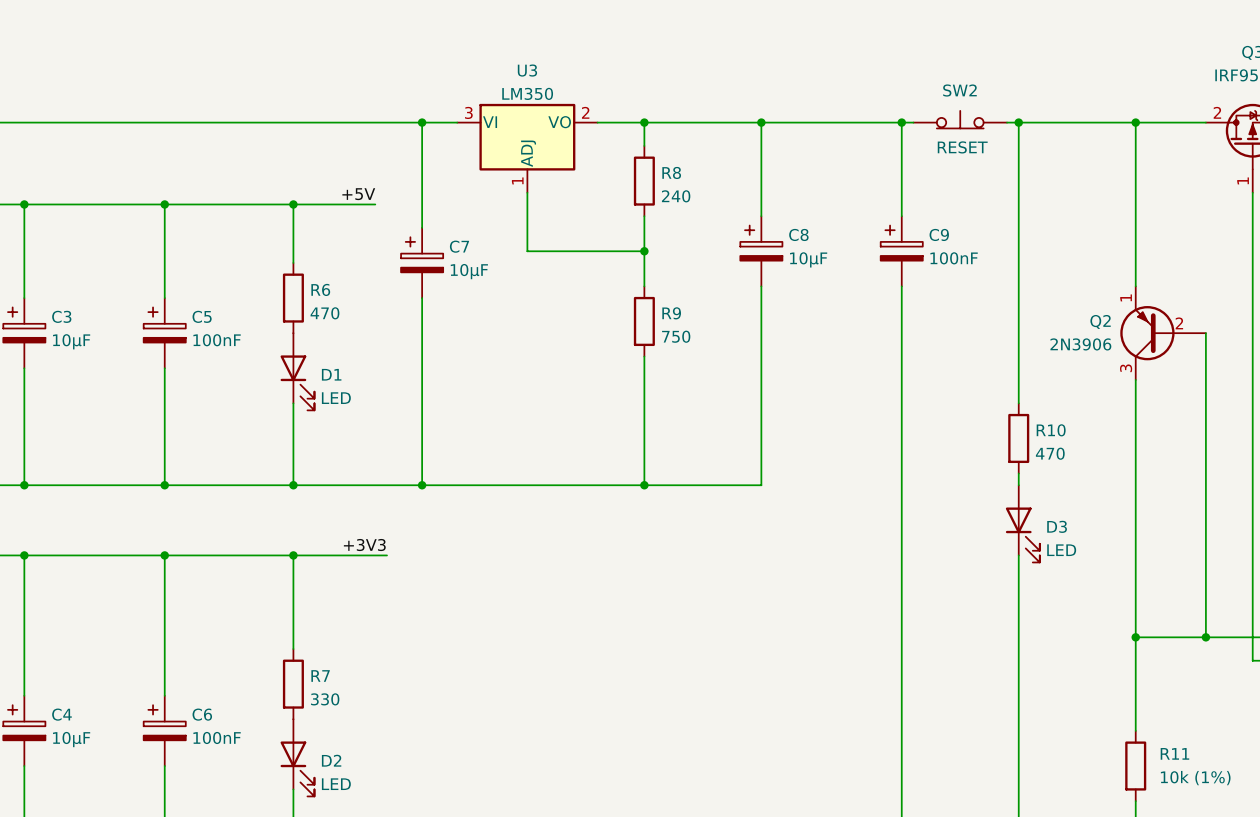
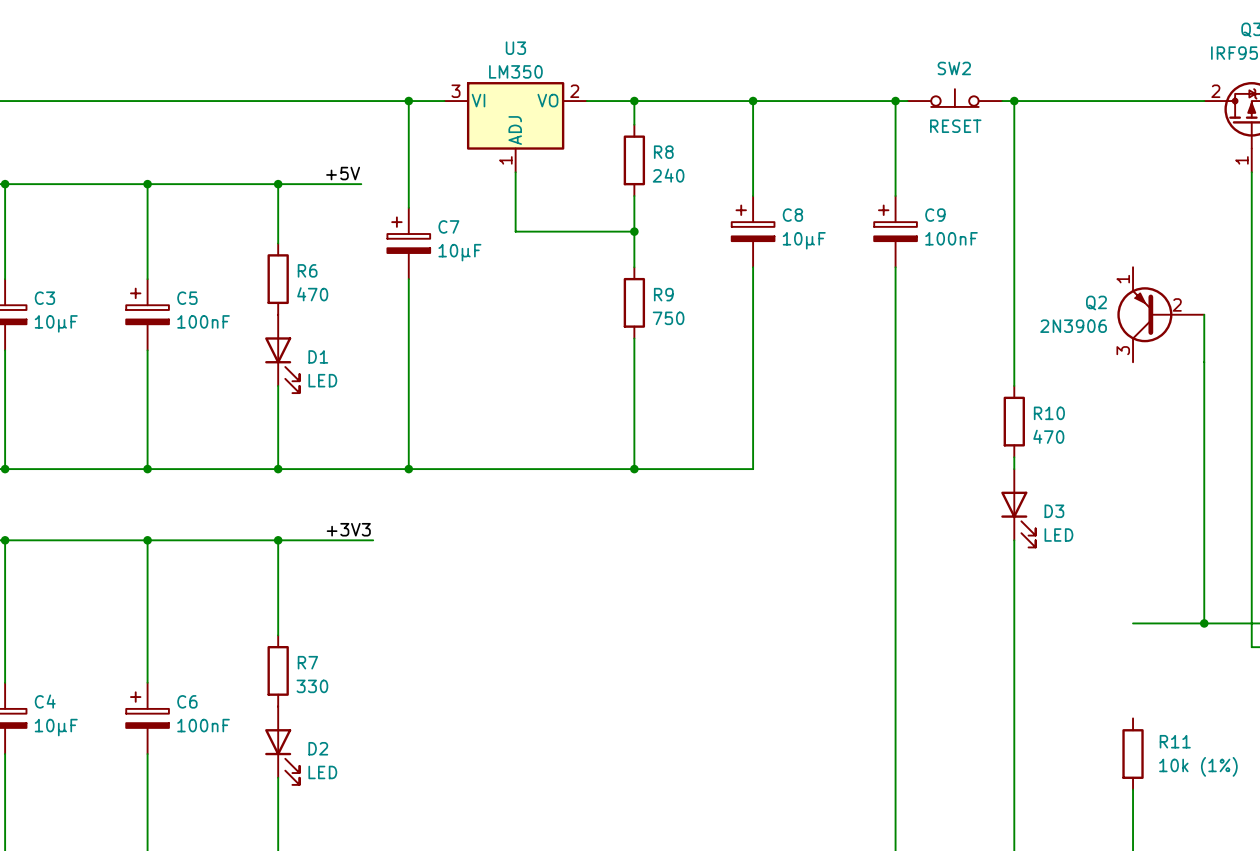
wire: (1135, 122) (1135, 286) -> none
junction: (1135, 122) -> none
wire: (1135, 379) (1135, 730) -> none
junction: (1135, 637) -> none

